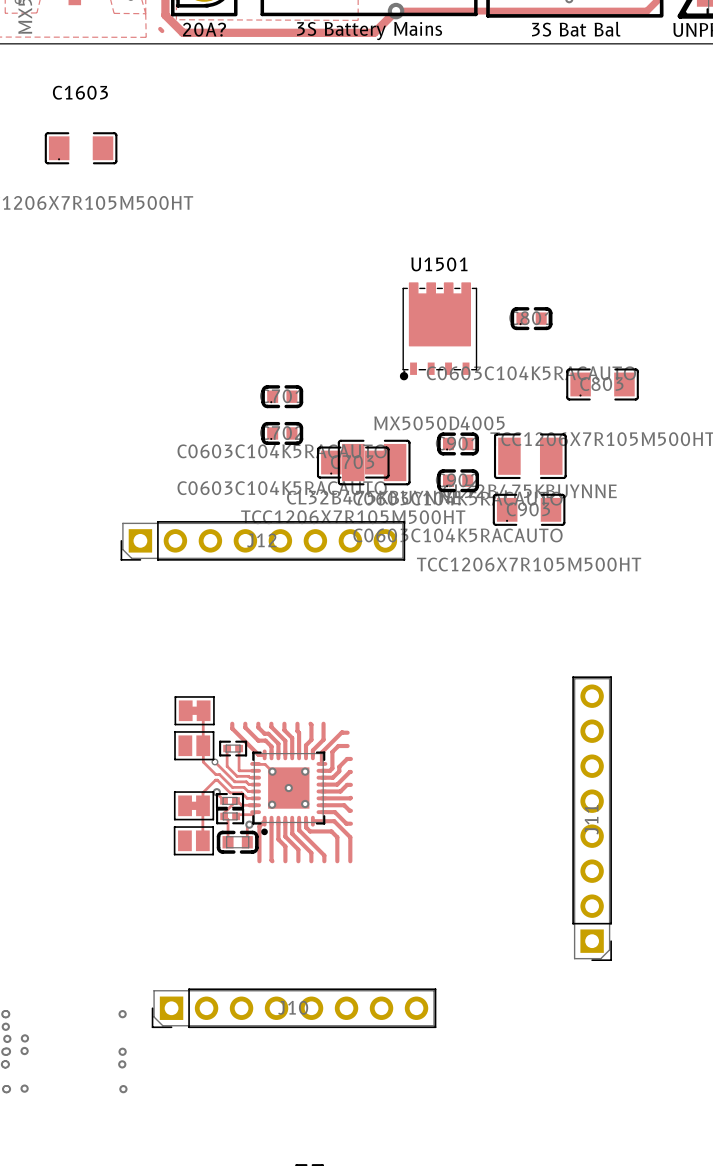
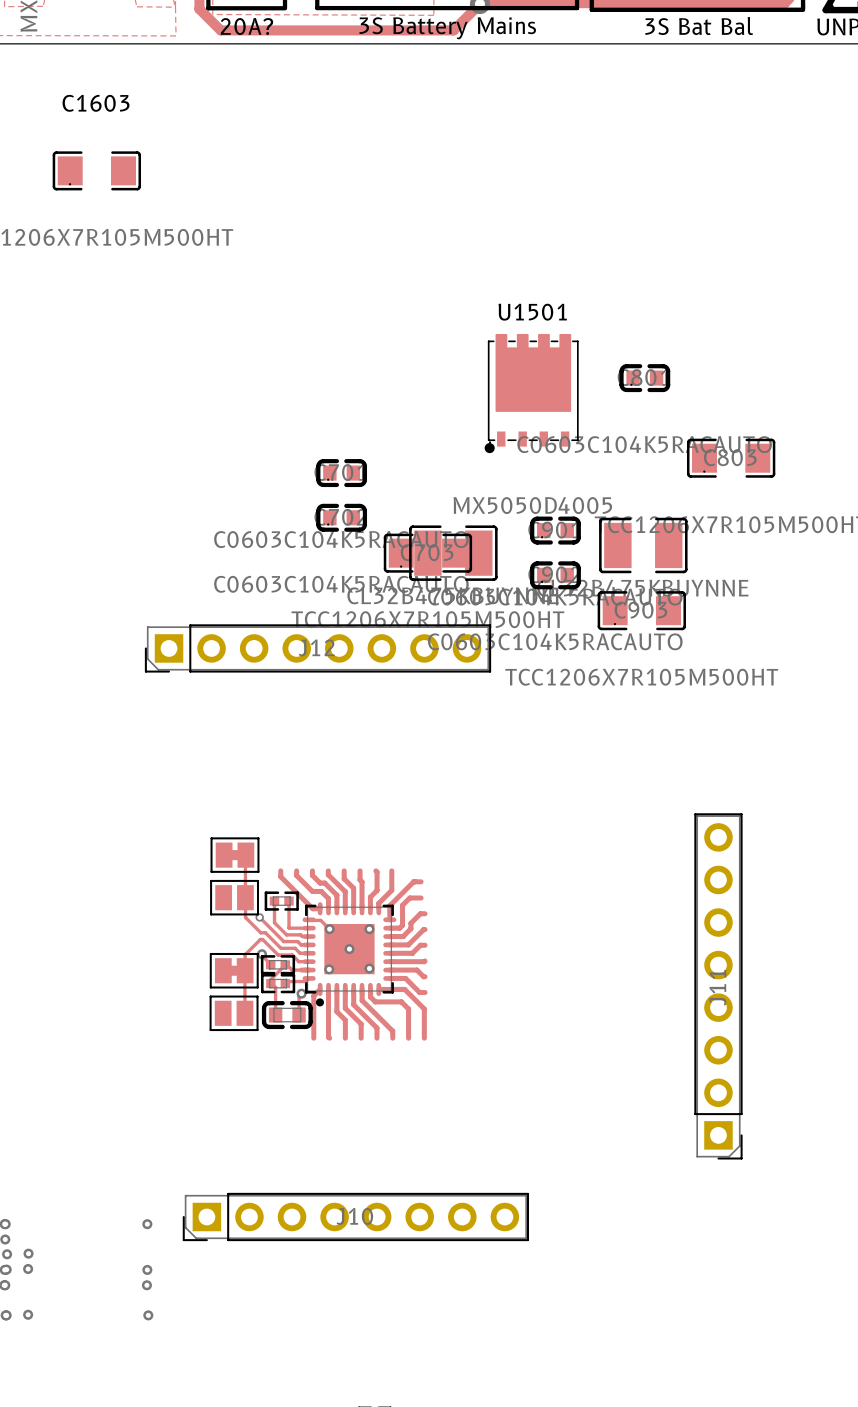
track: (160, 28) (162, 31) -> none

